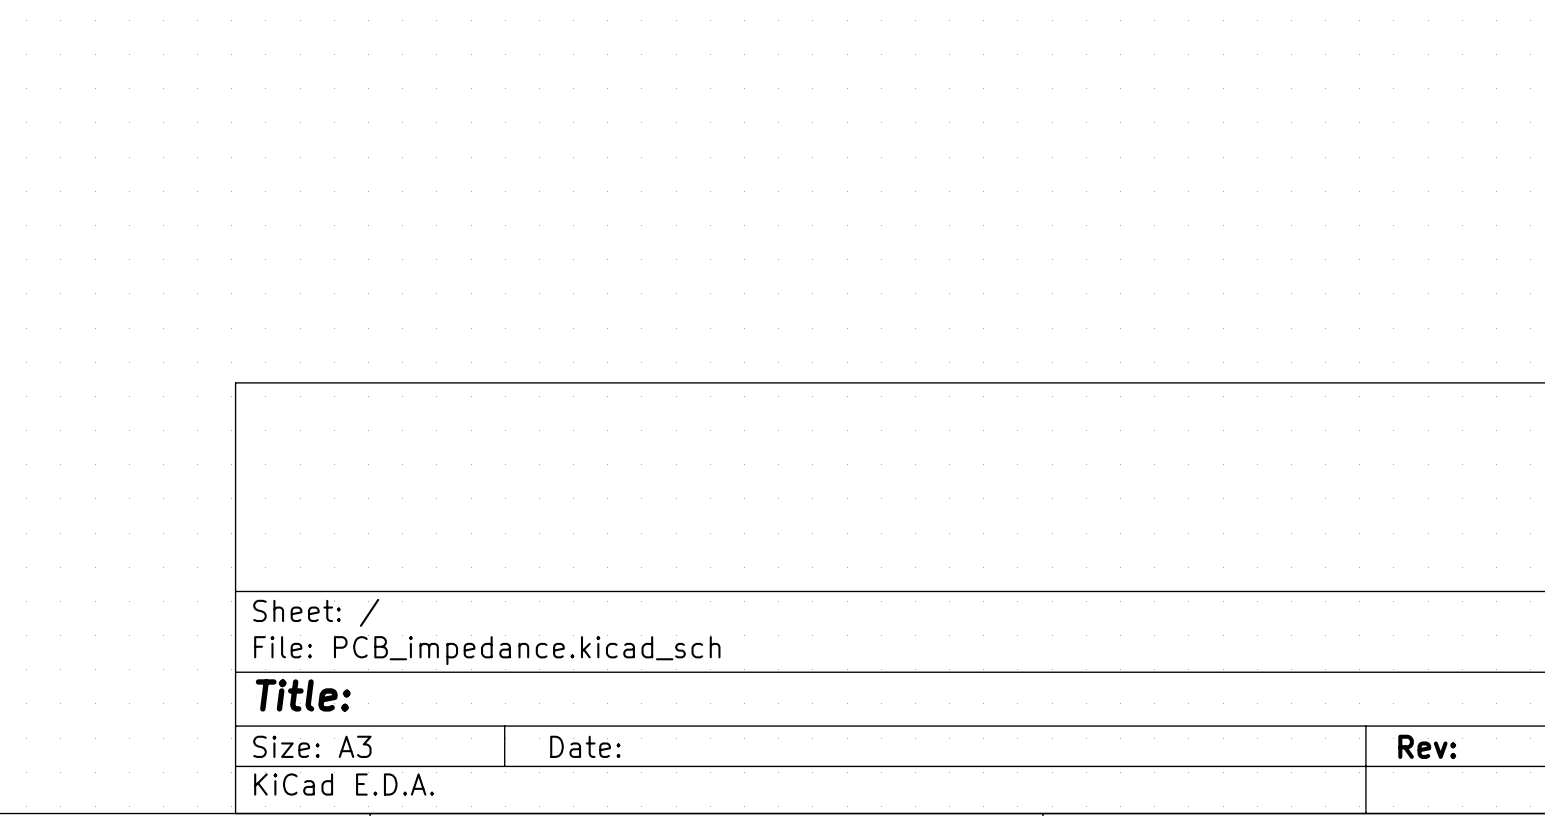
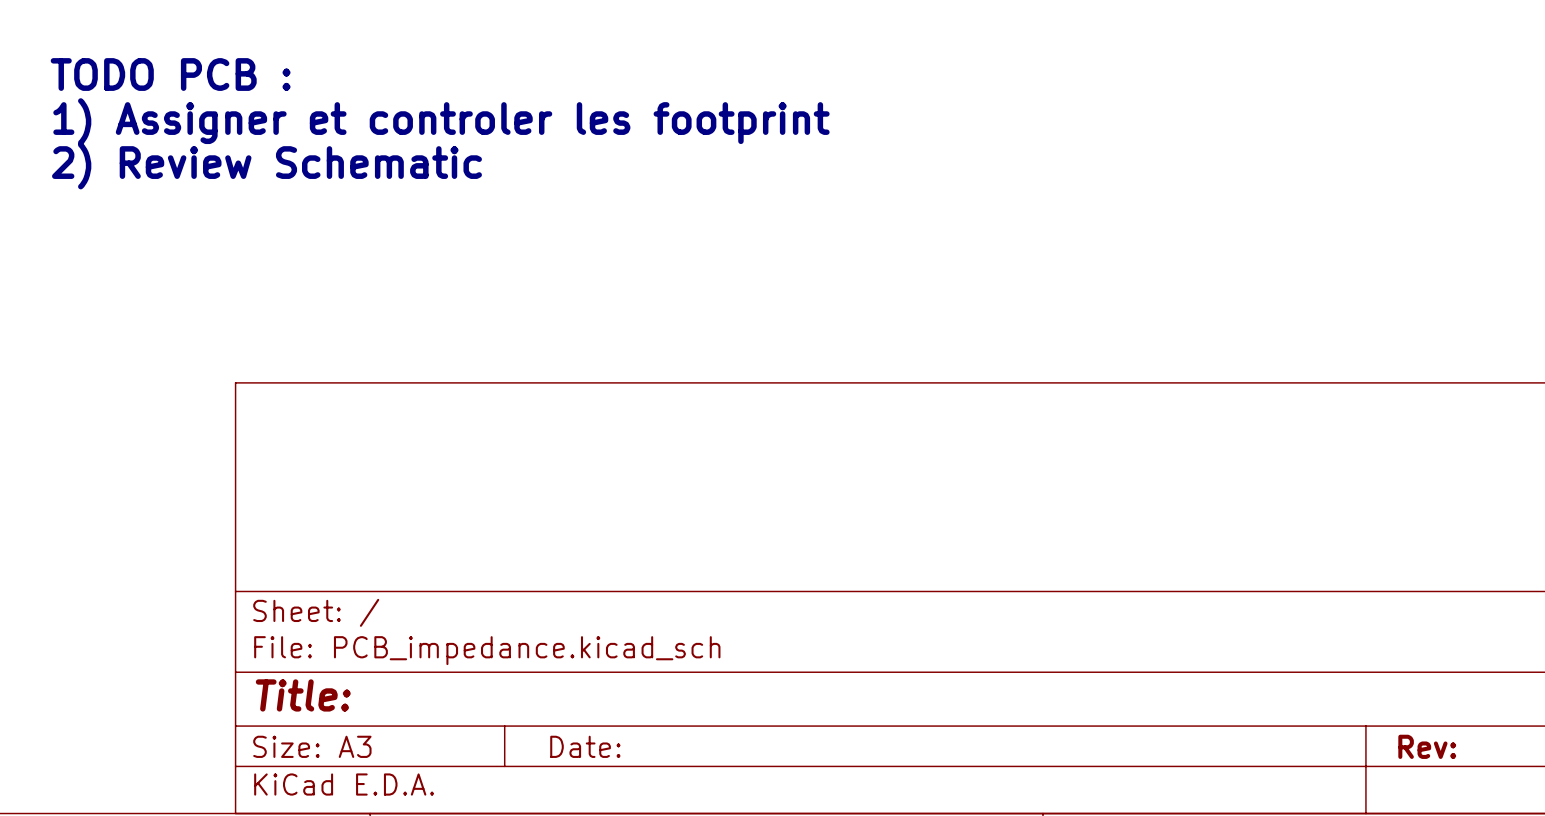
text: none -> TODO PCB : (170, 74)
text: none -> 1) Assigner et controler les footprint (441, 121)
text: none -> 2) Review Schematic (266, 165)

